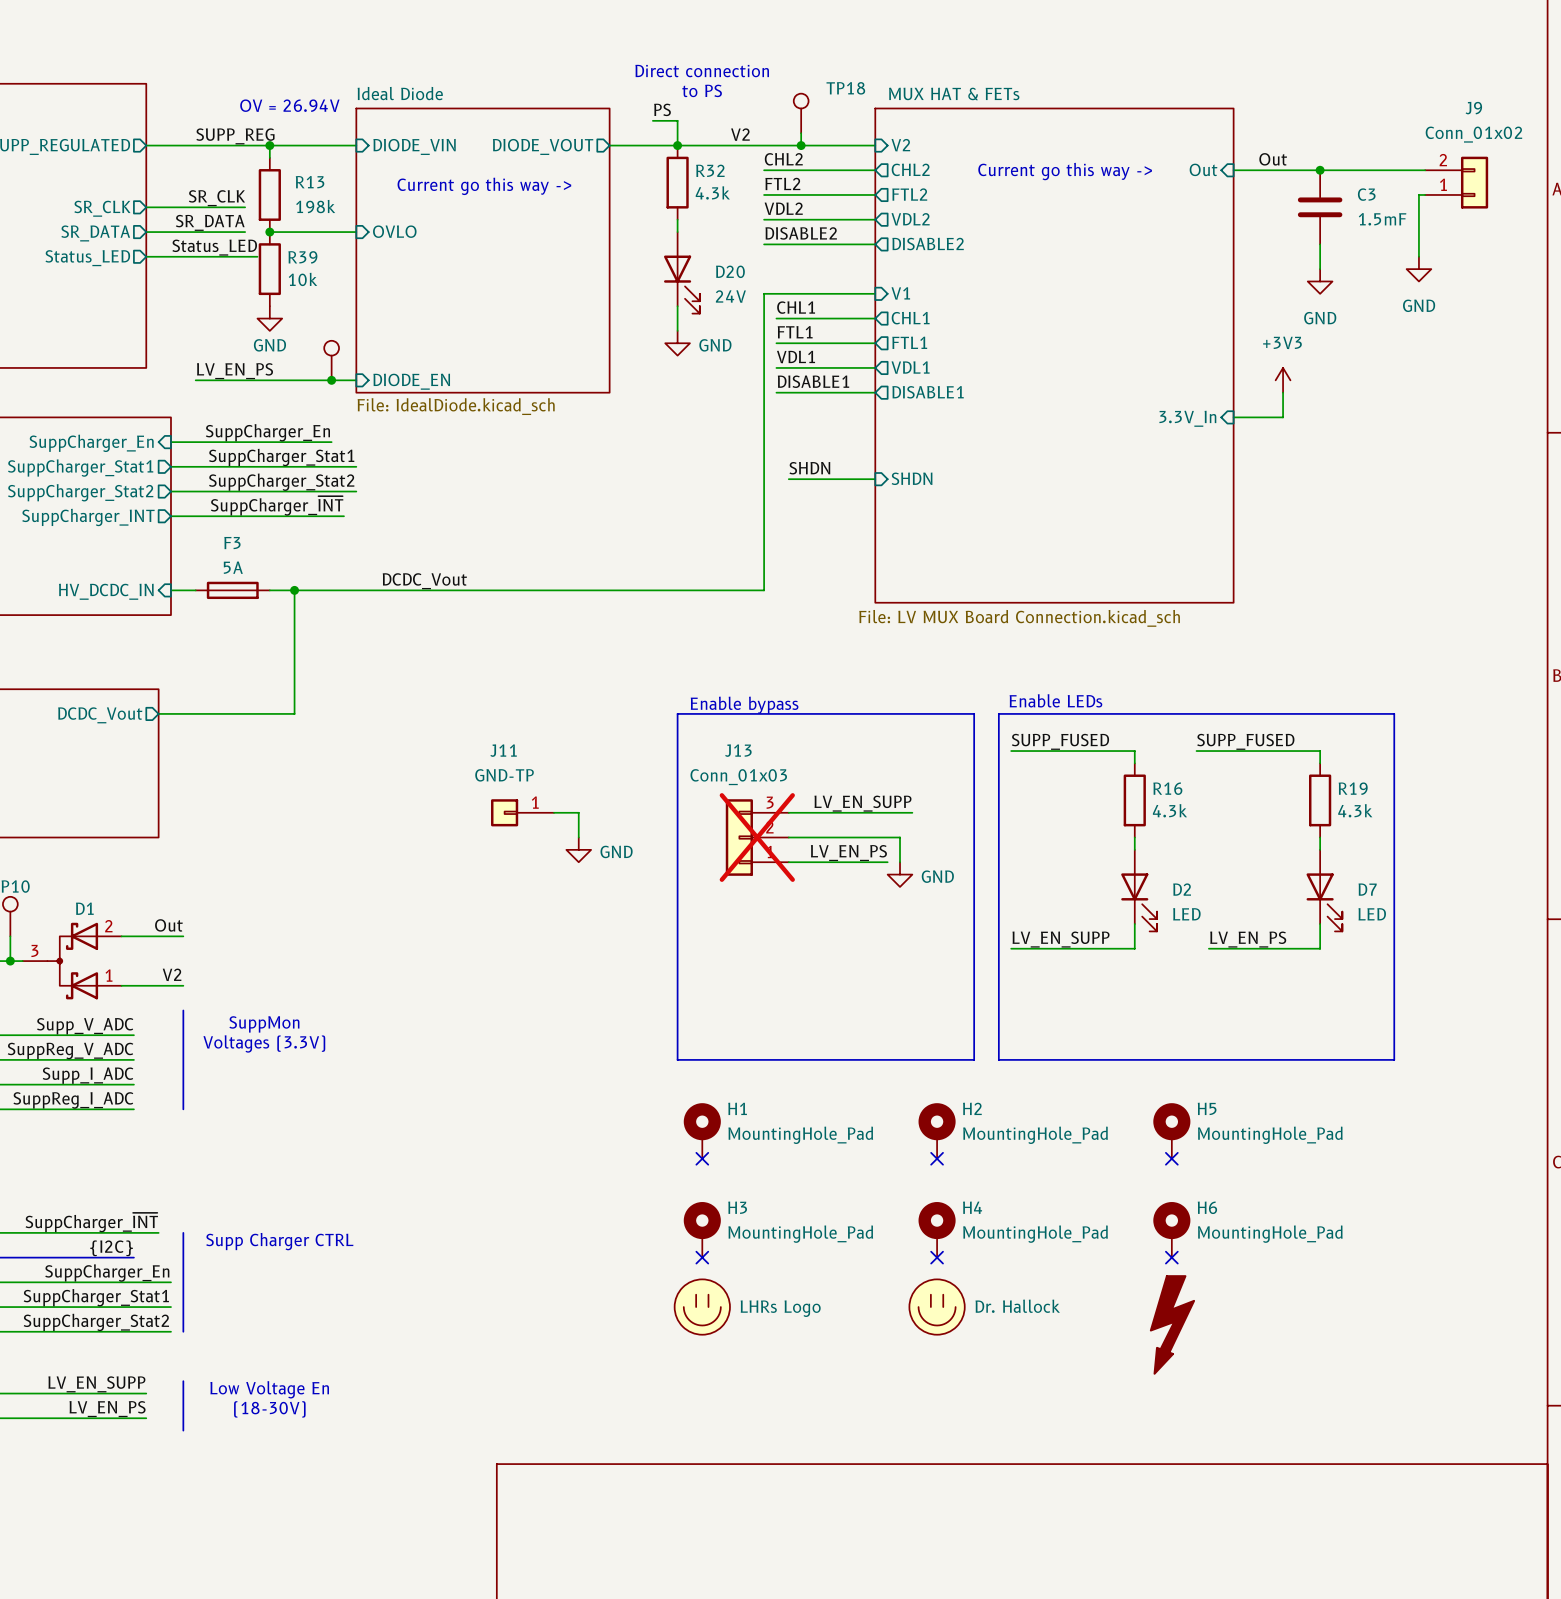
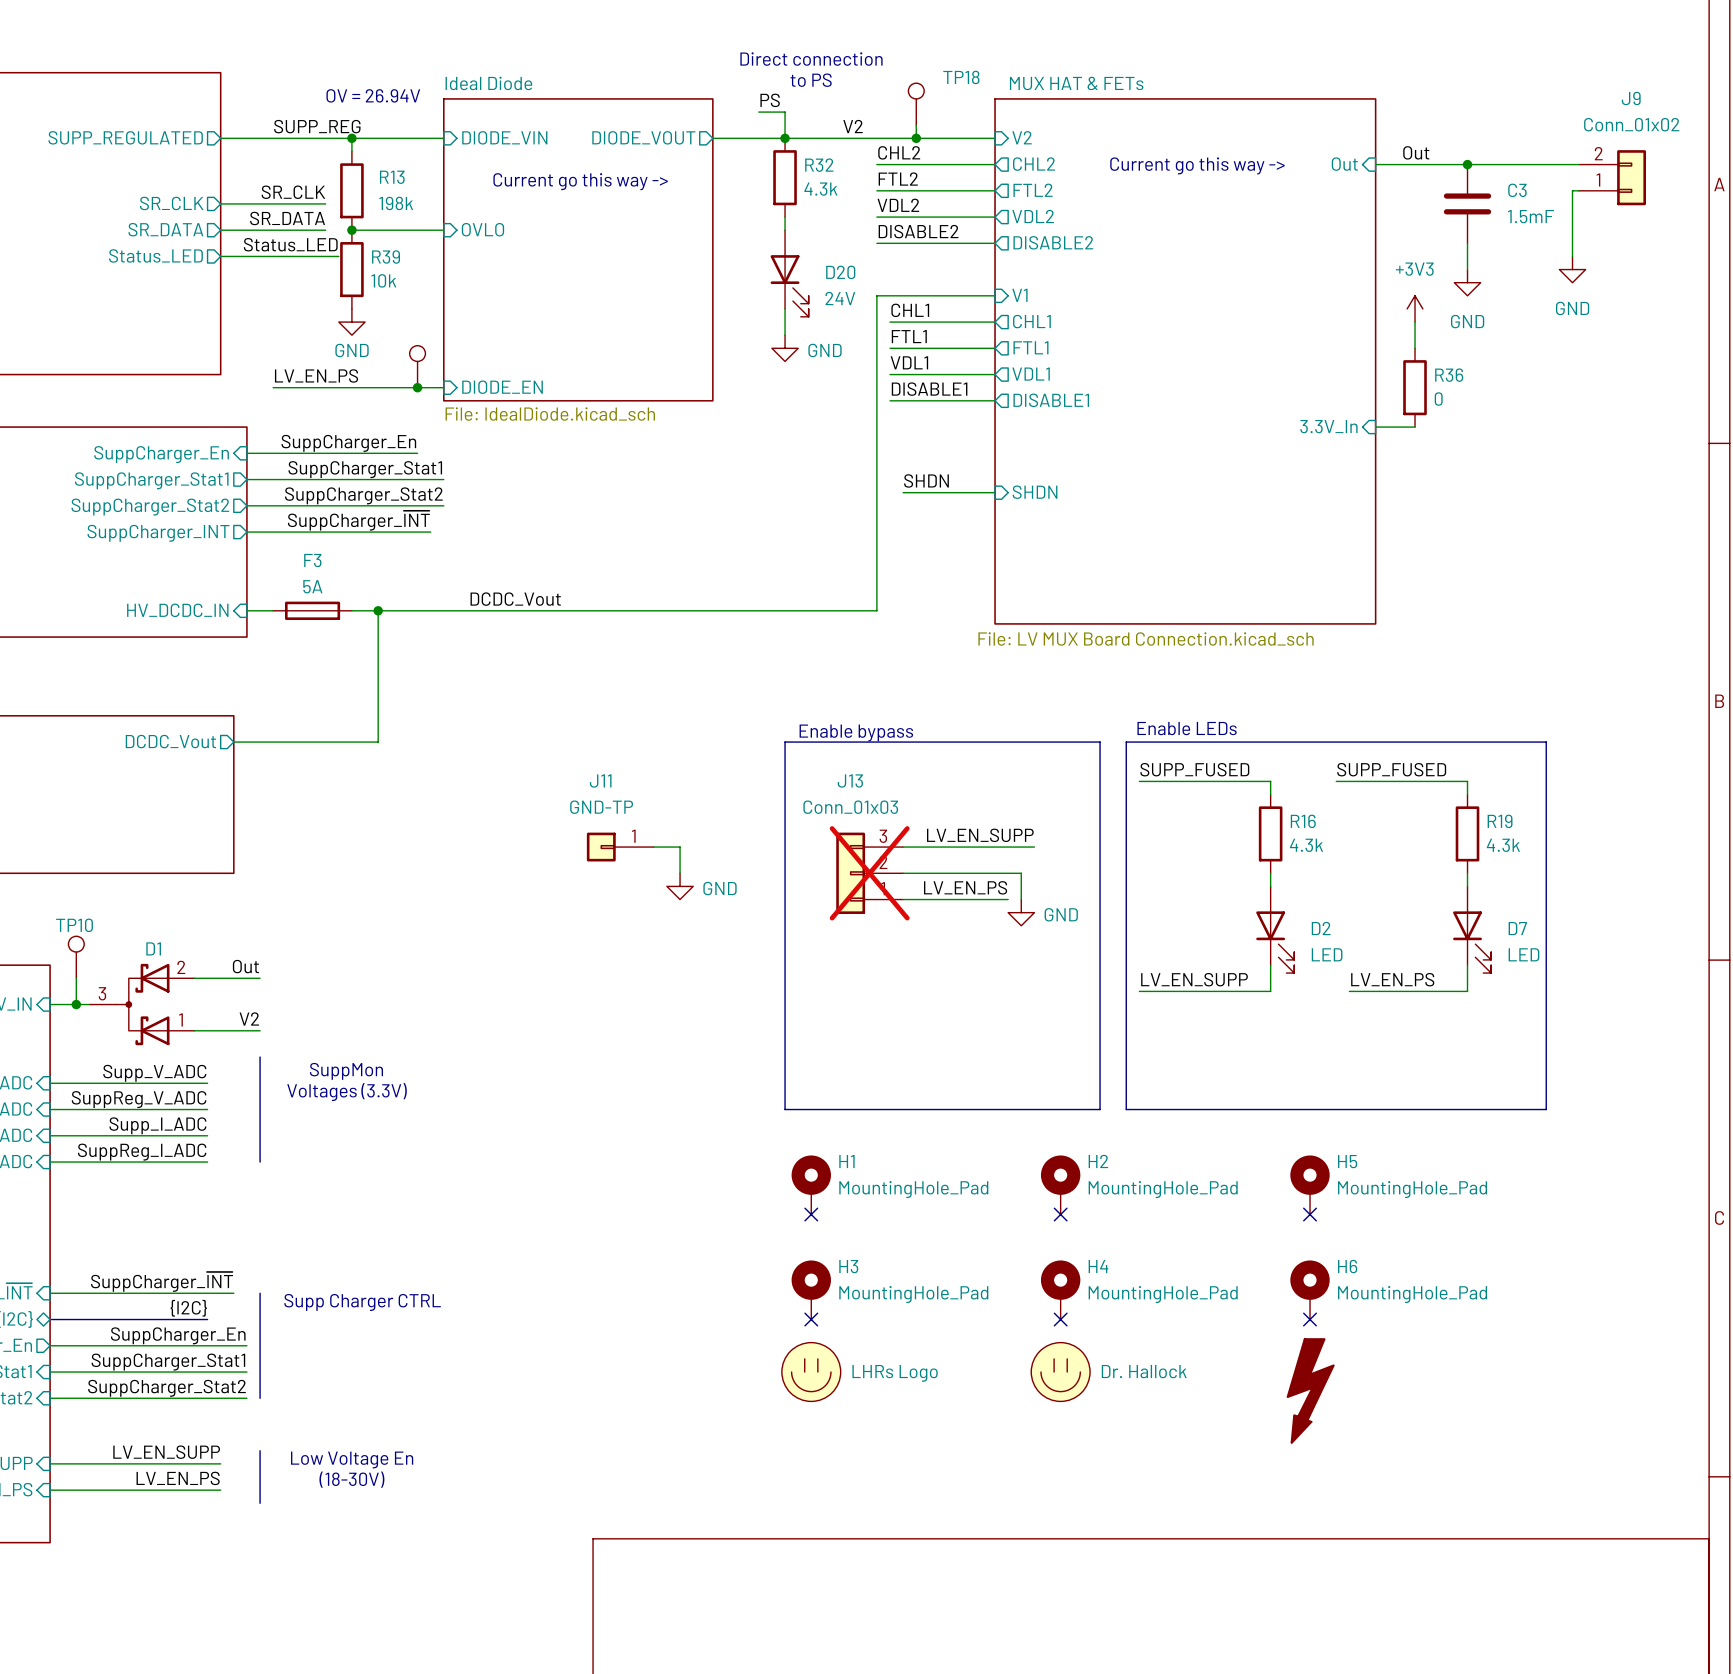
wire: none -> (1415, 322) (1415, 348)
R36: none -> 0 (1415, 387)
power symbol position: +3V3 (1283, 380) -> +3V3 (1415, 308)
wire: (1283, 392) (1283, 417) (1270, 417) -> none

